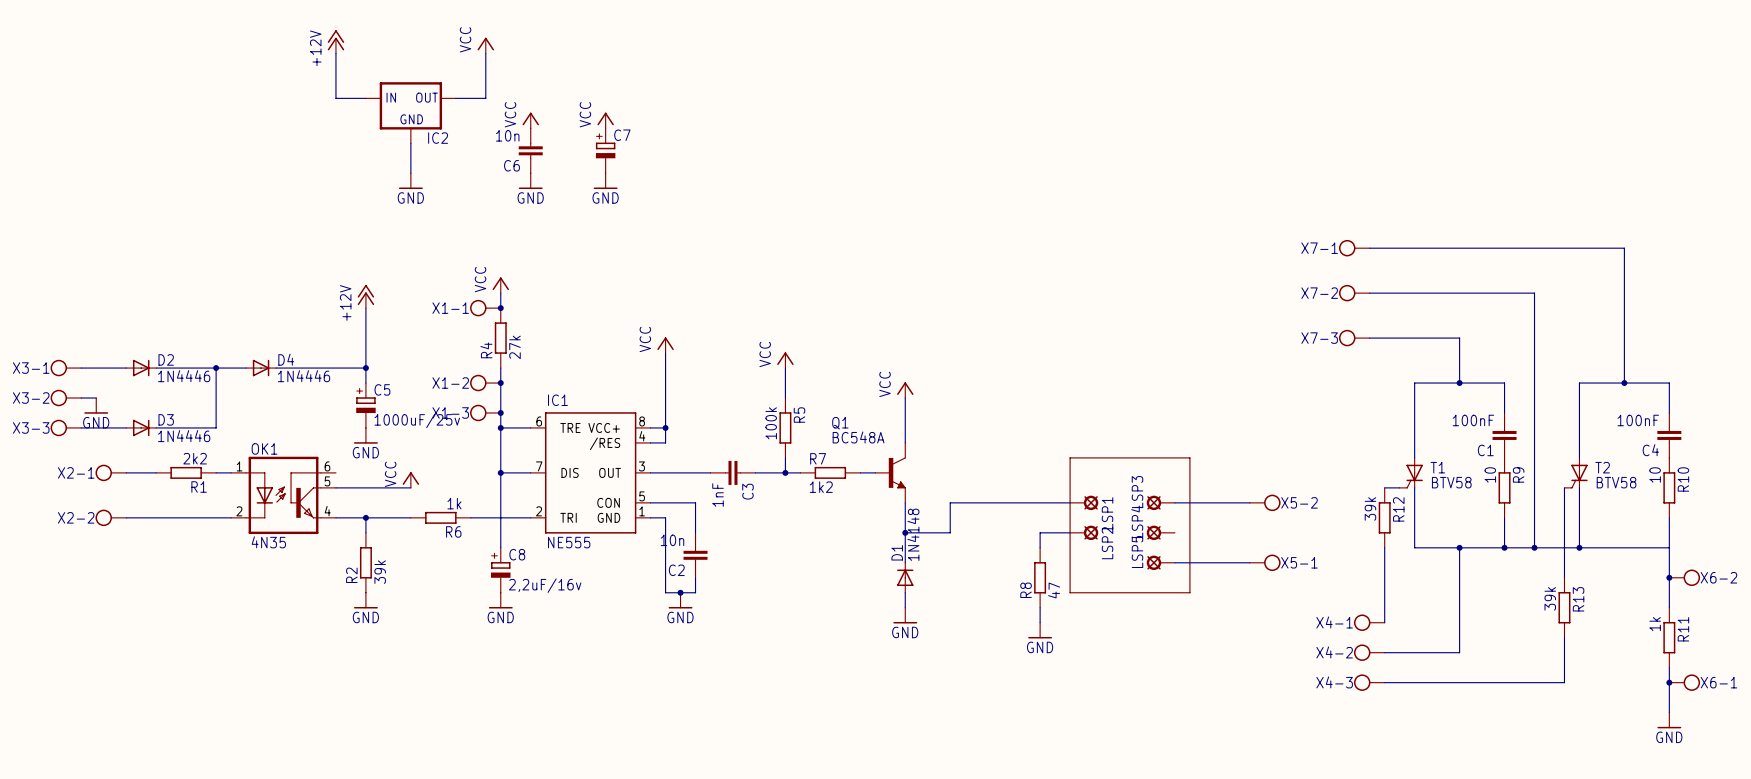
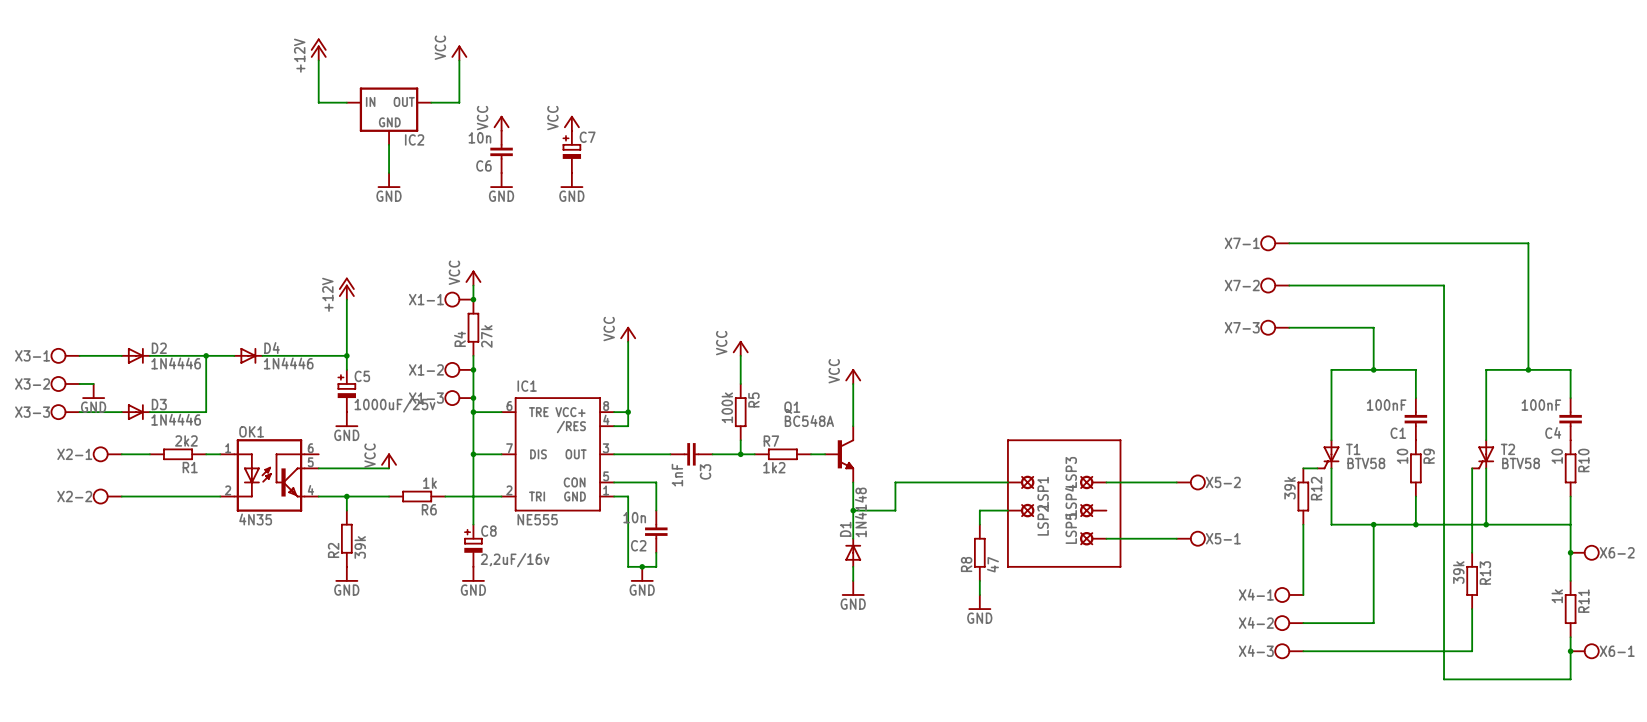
wire: none -> (1444, 524) (1444, 679) (1570, 679)
junction: (1534, 547) -> none
power symbol: GND (1669, 720) -> none

